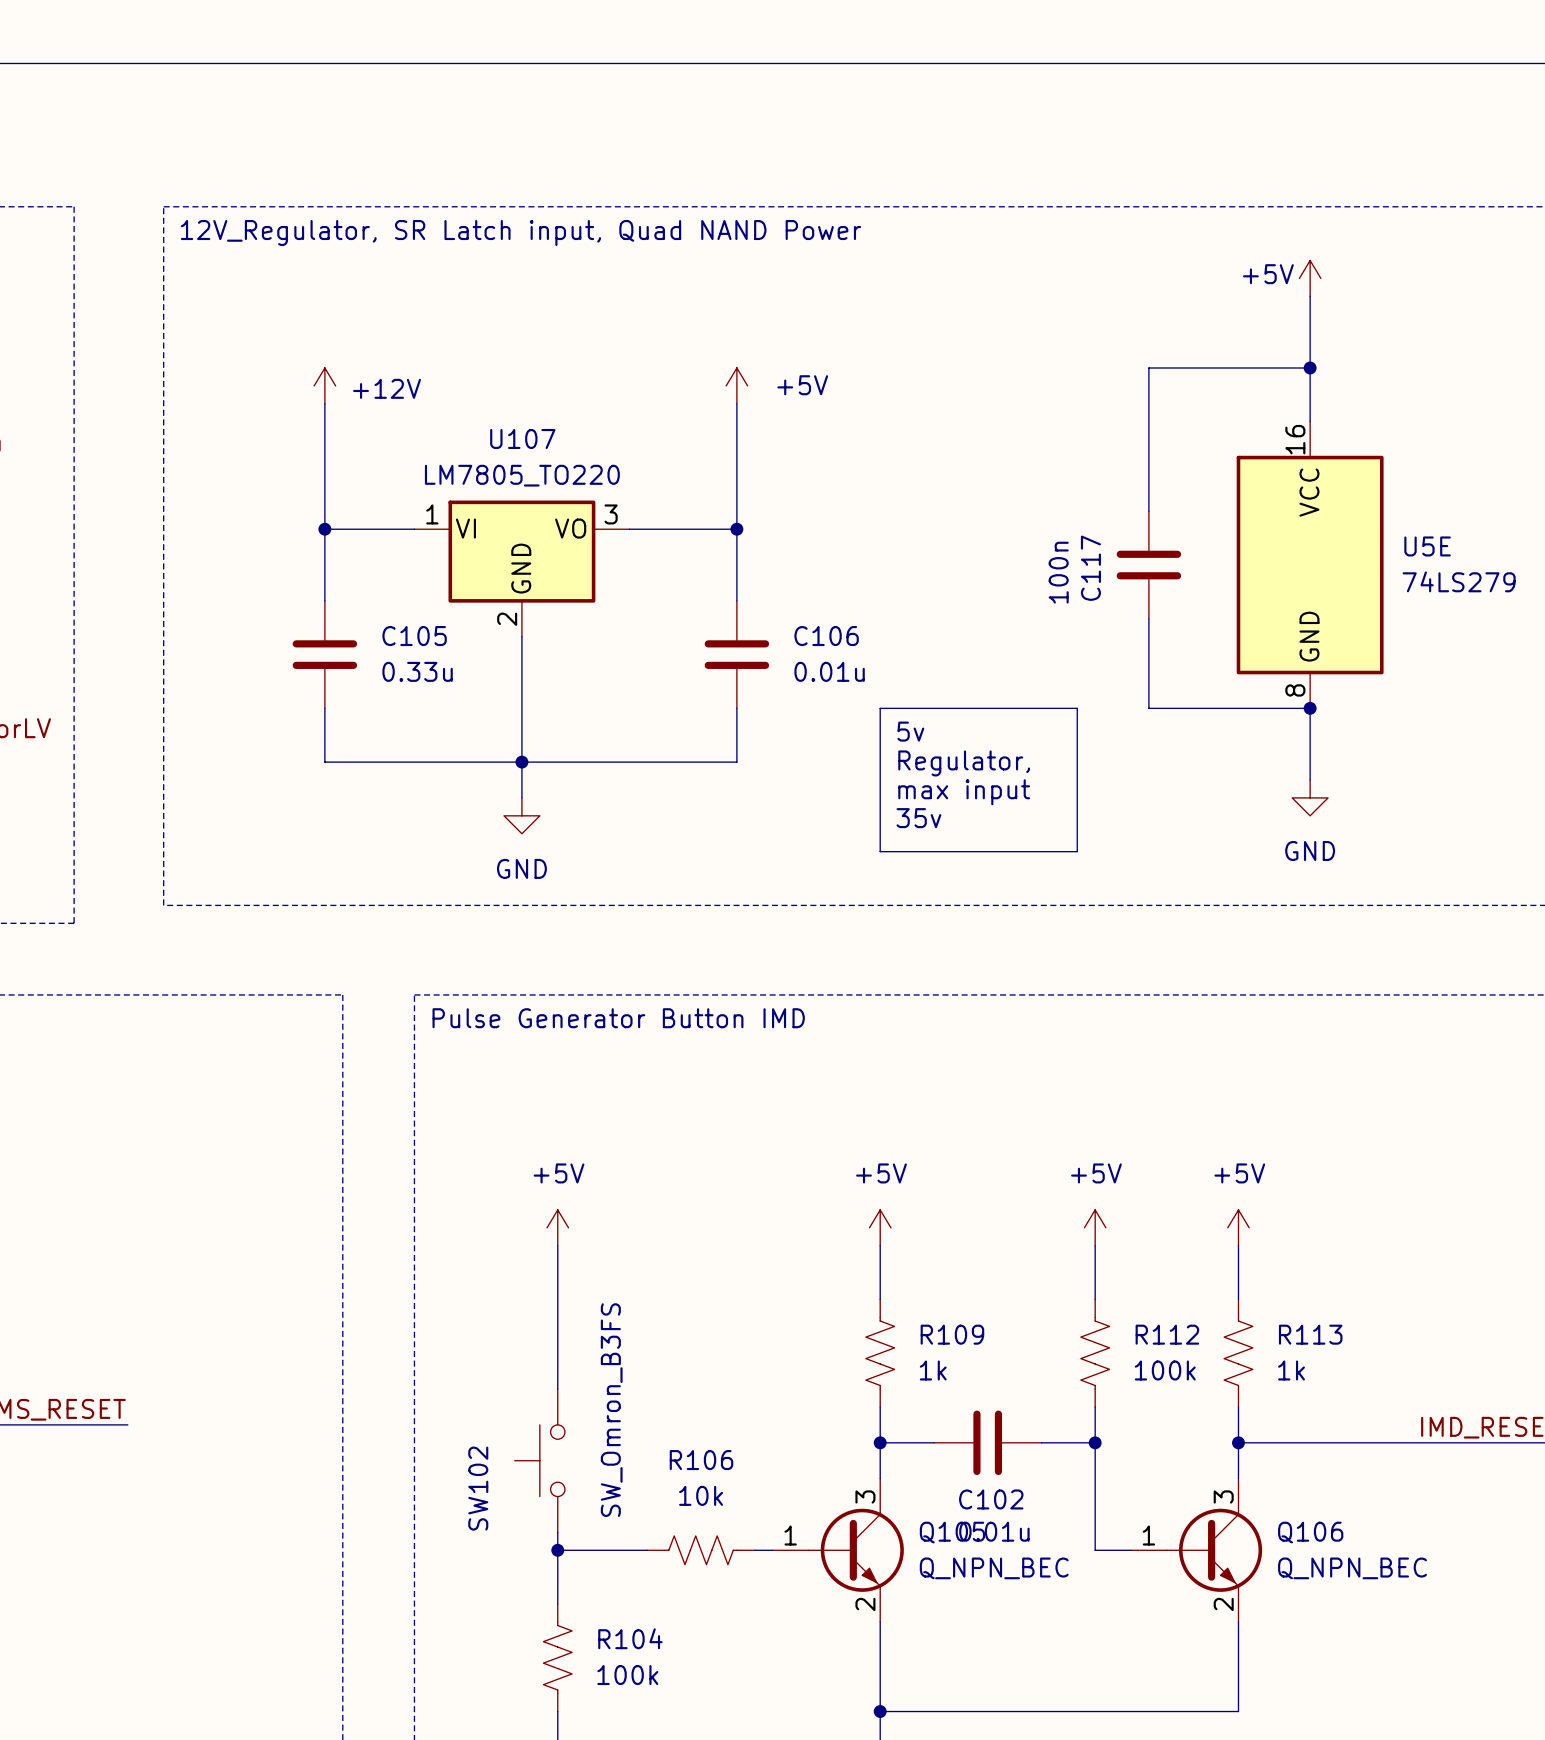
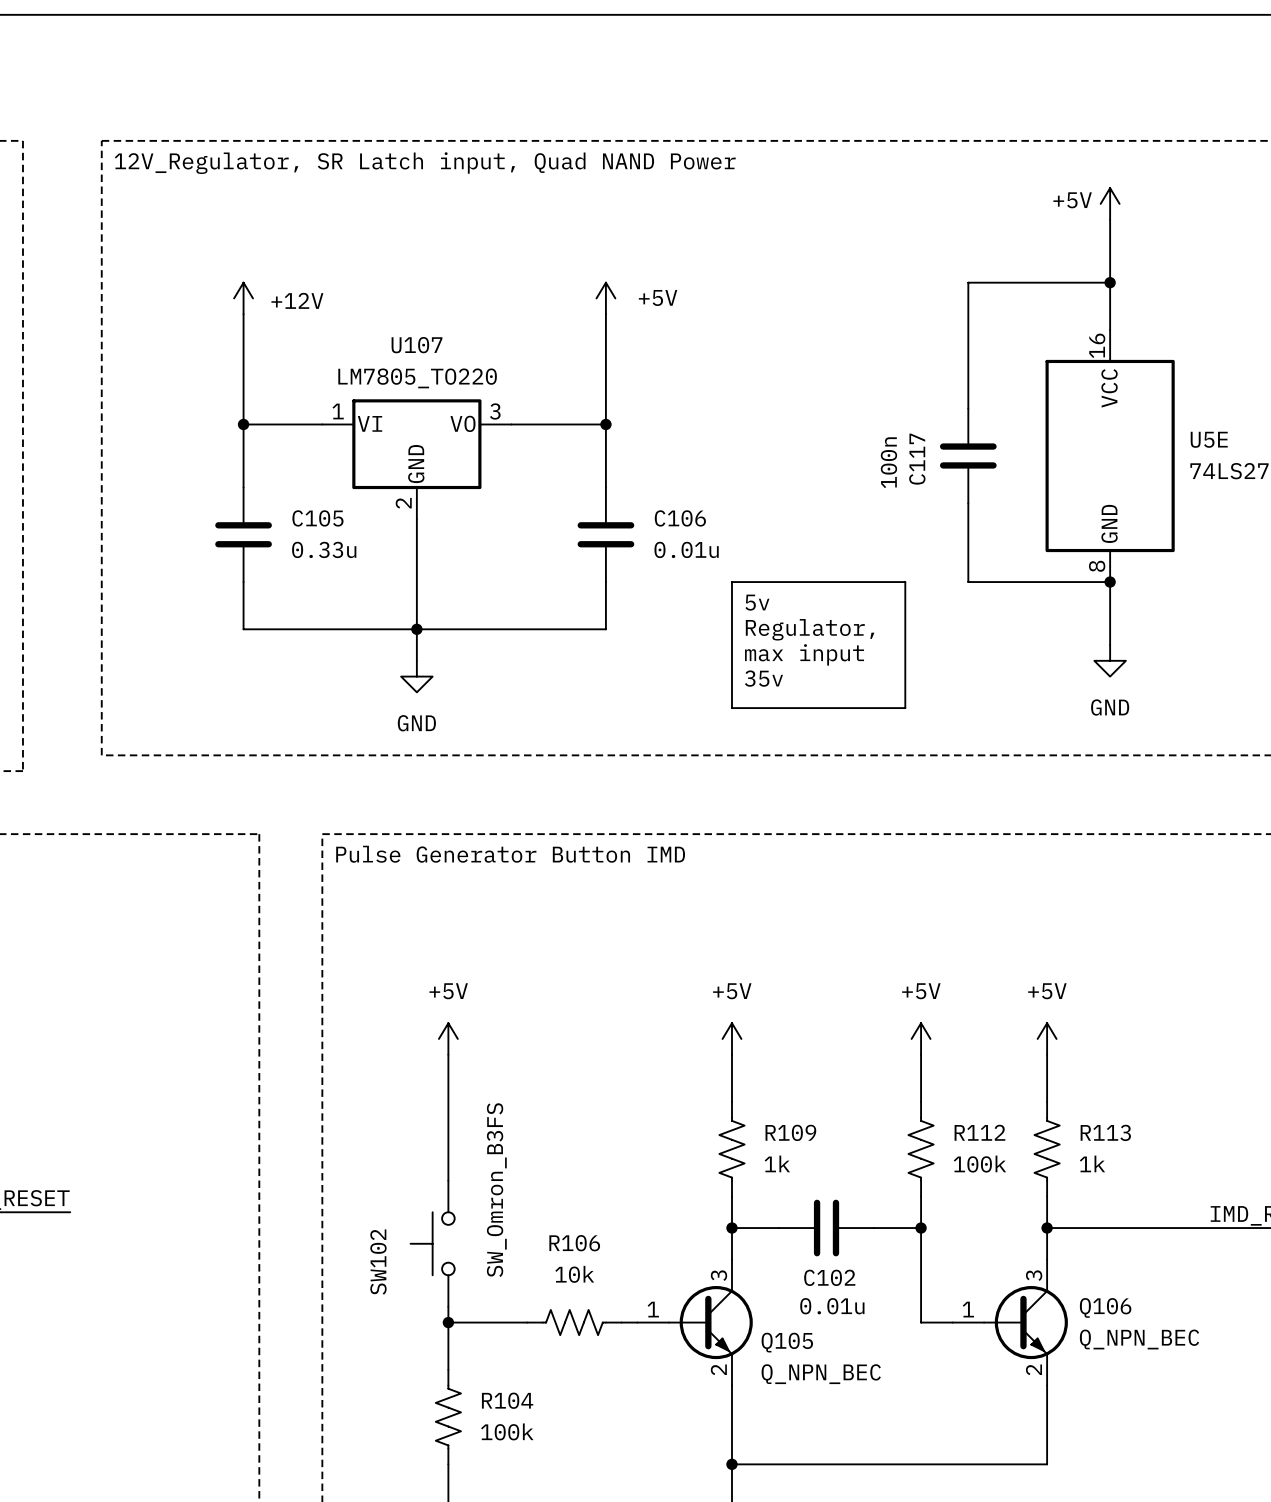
Q105 name position: Q105 (952, 1532) -> Q105 (787, 1342)
Q105 value position: Q_NPN_BEC (994, 1568) -> Q_NPN_BEC (821, 1374)

